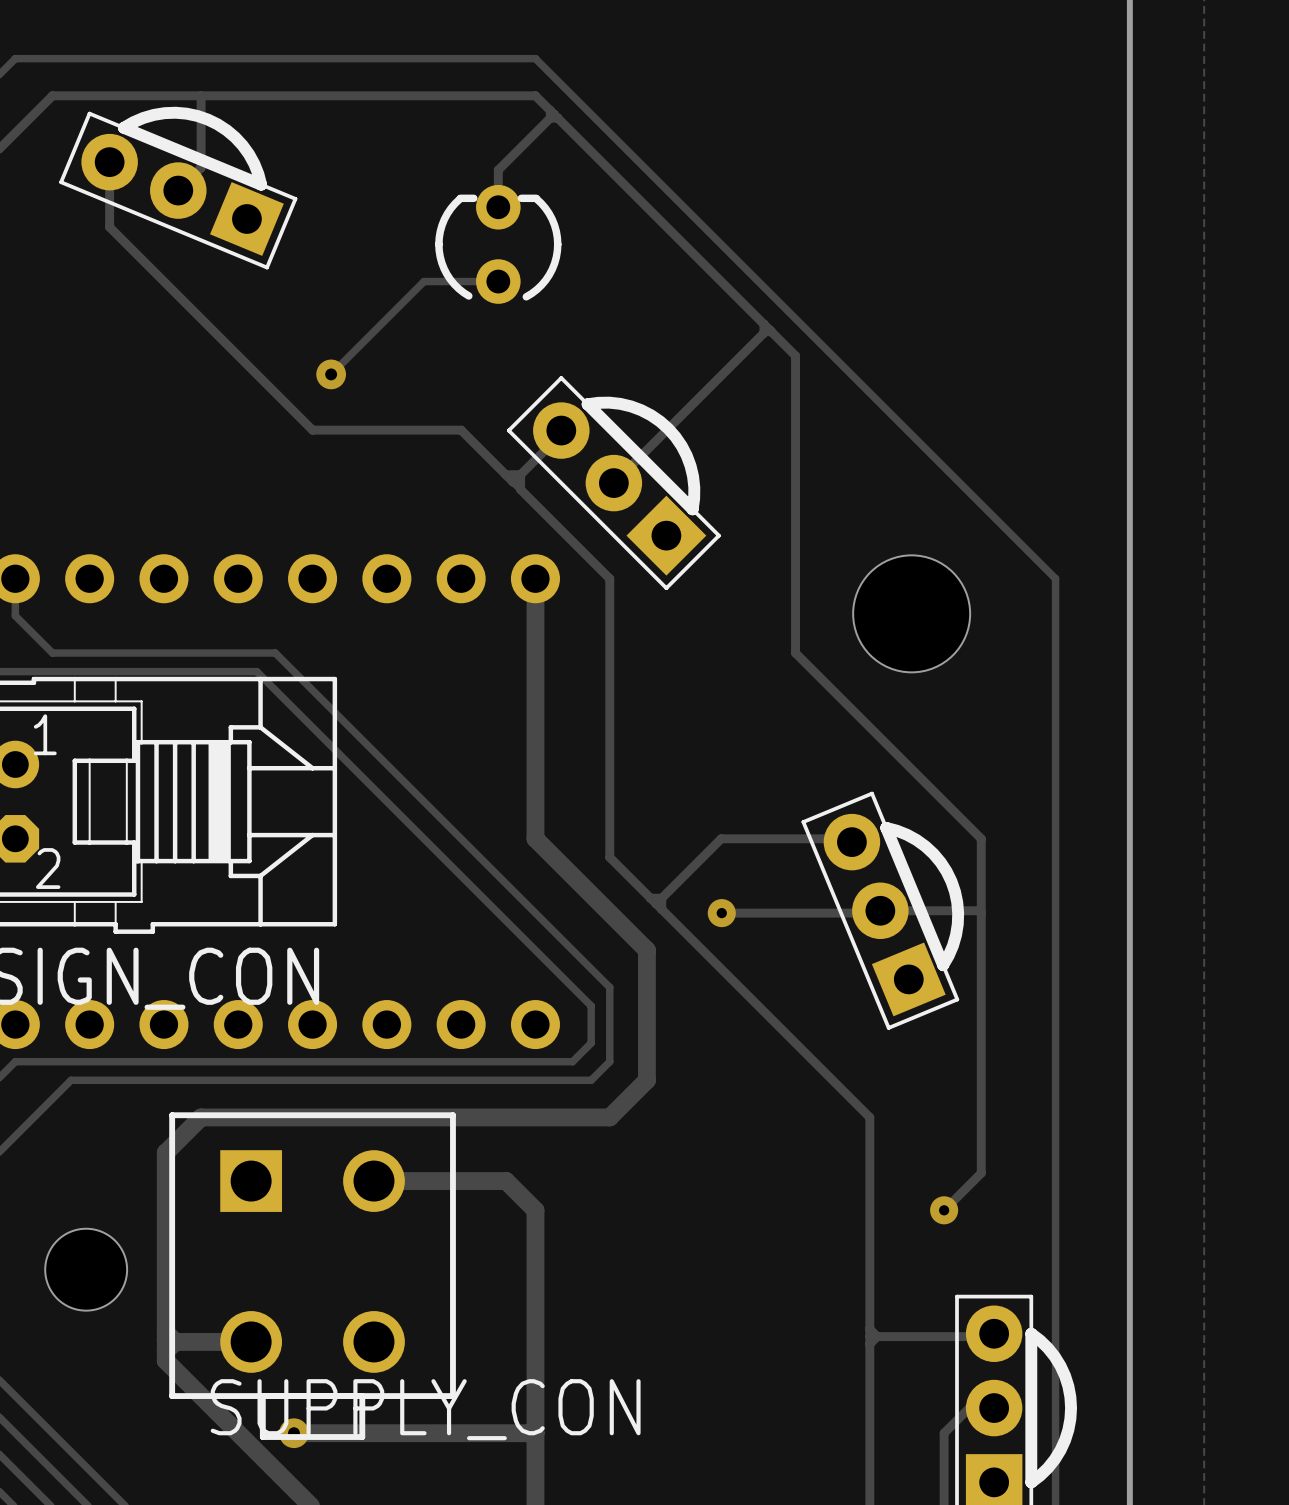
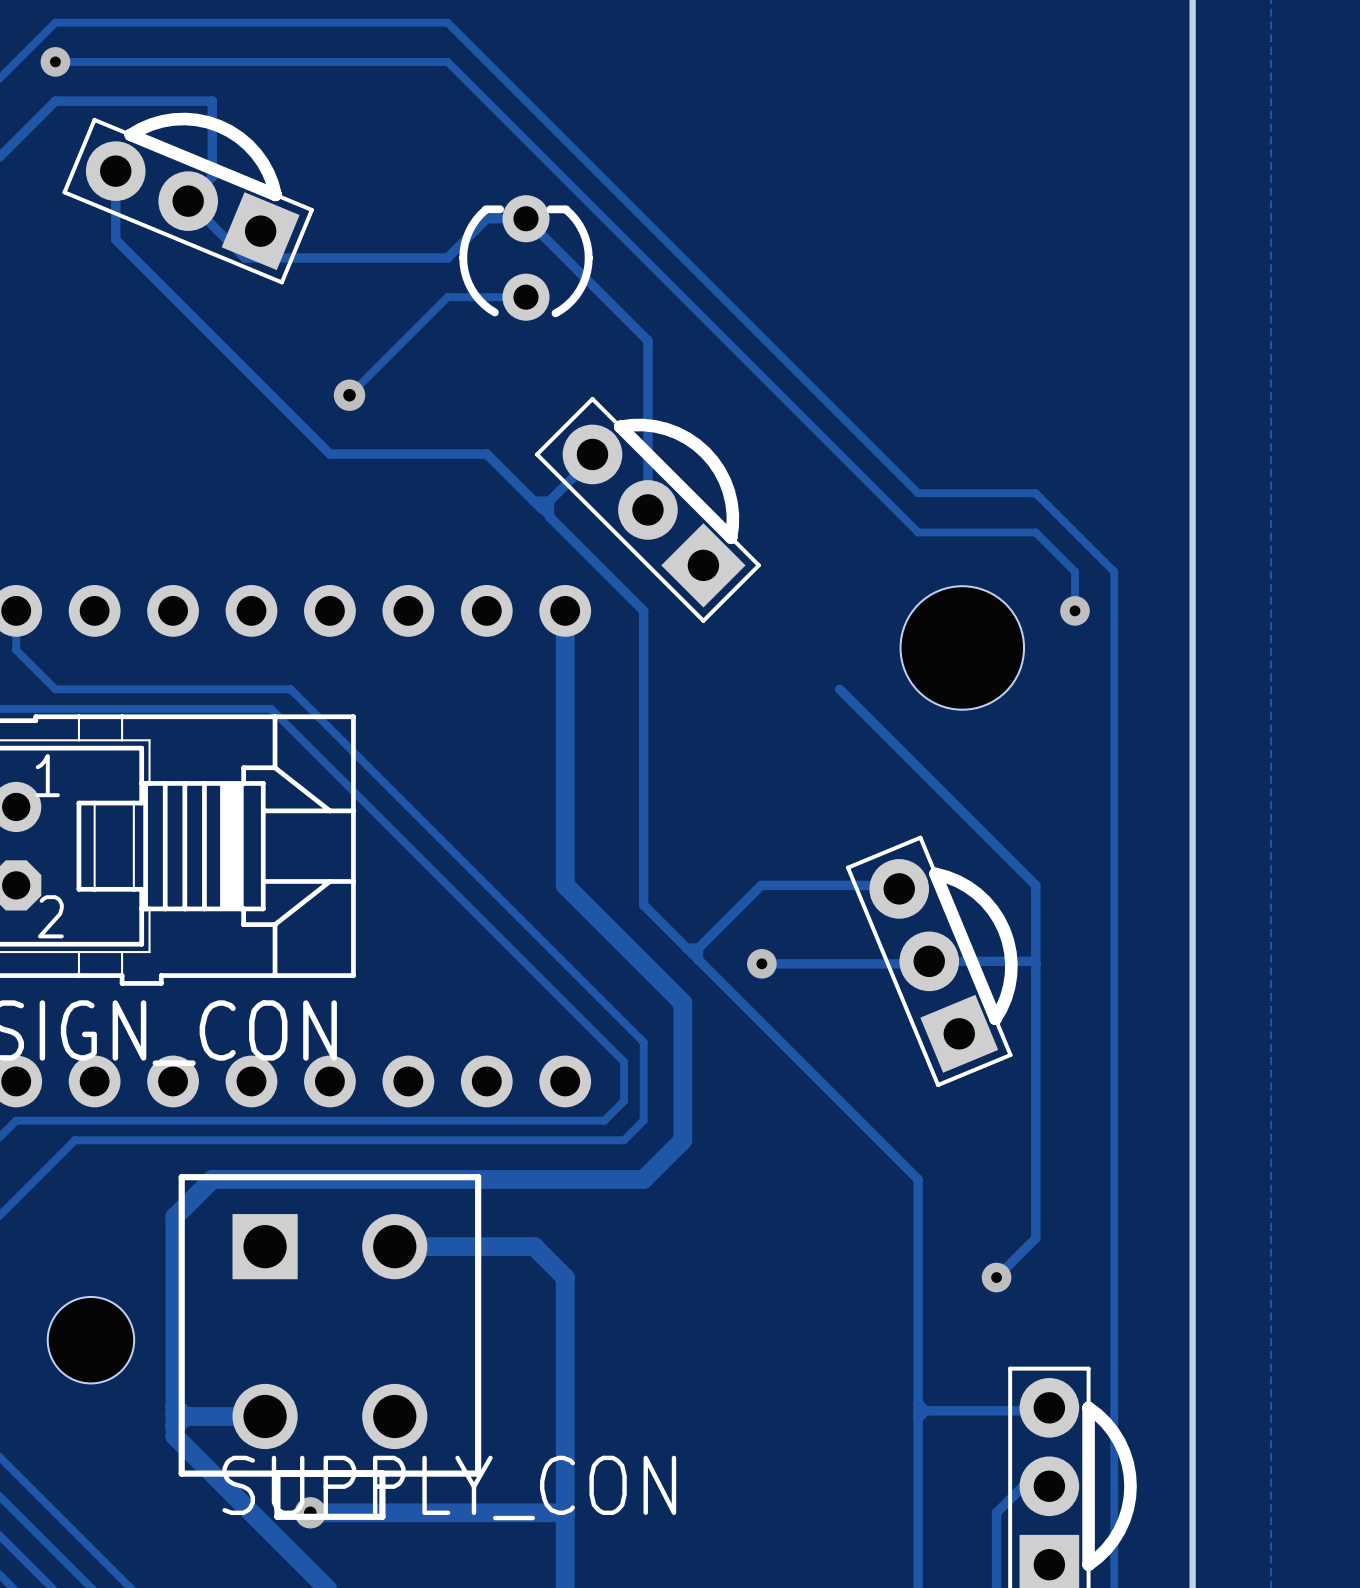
track: (52, 58) (15, 58) -> (1114, 610) (1114, 571) (1035, 493) (918, 493) (447, 22) (55, 22) (16, 61)
via: none -> (55, 61)
track: (424, 58) (535, 58) (981, 504) -> (447, 61) (918, 532) (1035, 532)
track: (201, 95) (535, 95) (795, 355) (795, 653) -> none
track: (554, 114) (498, 170) (498, 207) -> none
track: (769, 329) (767, 329) (613, 483) -> (188, 201) (245, 257) (447, 257) (486, 218) (525, 218) (647, 340) (647, 509)
track: (1018, 541) (1055, 578) -> (1074, 571) (1074, 610)
via: none -> (1074, 610)

